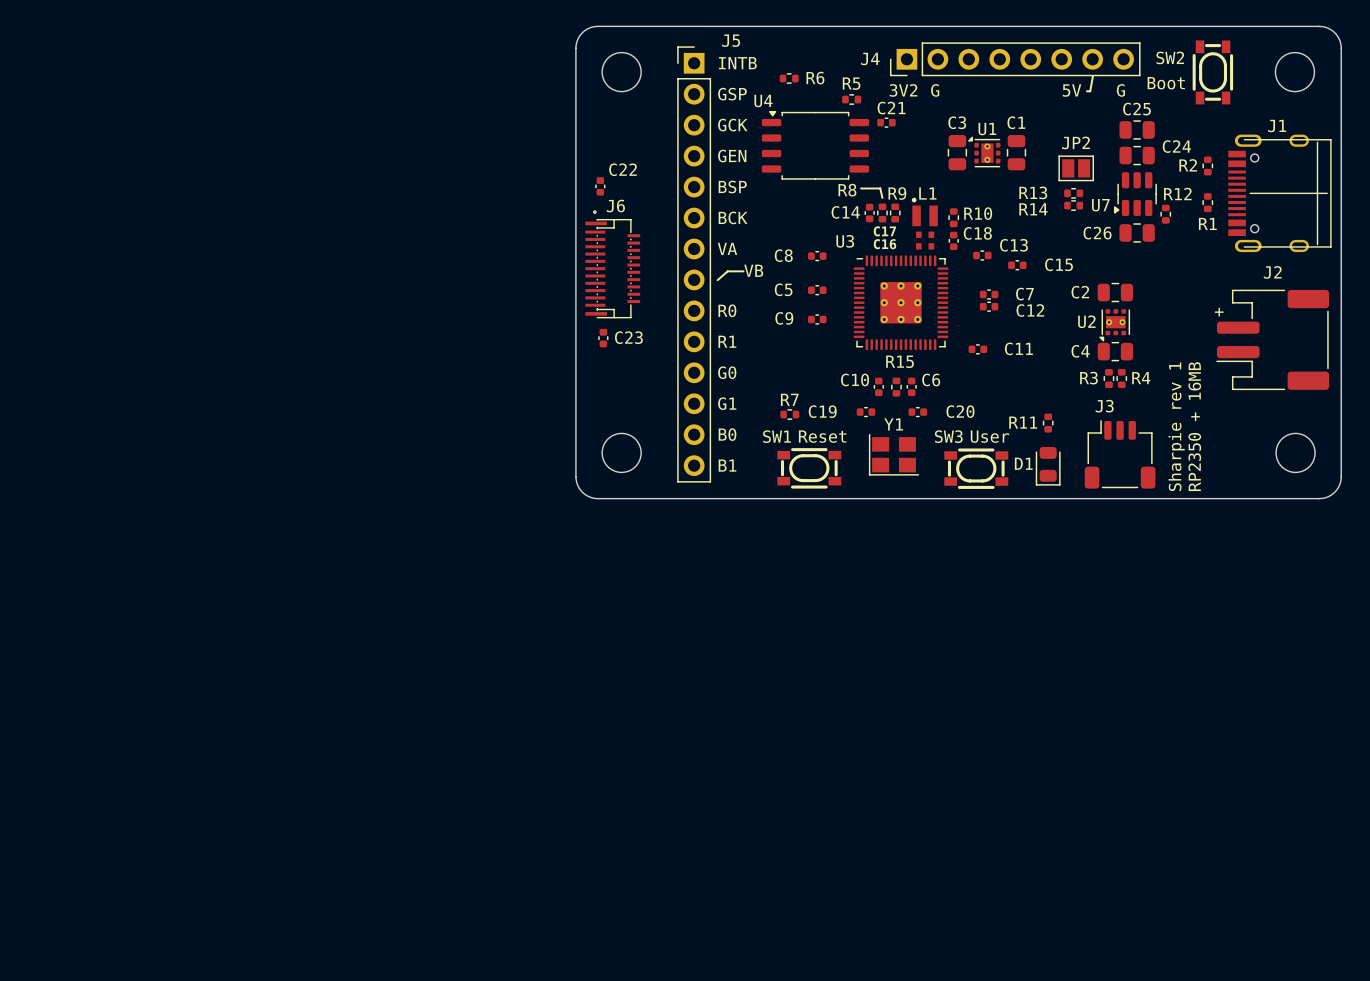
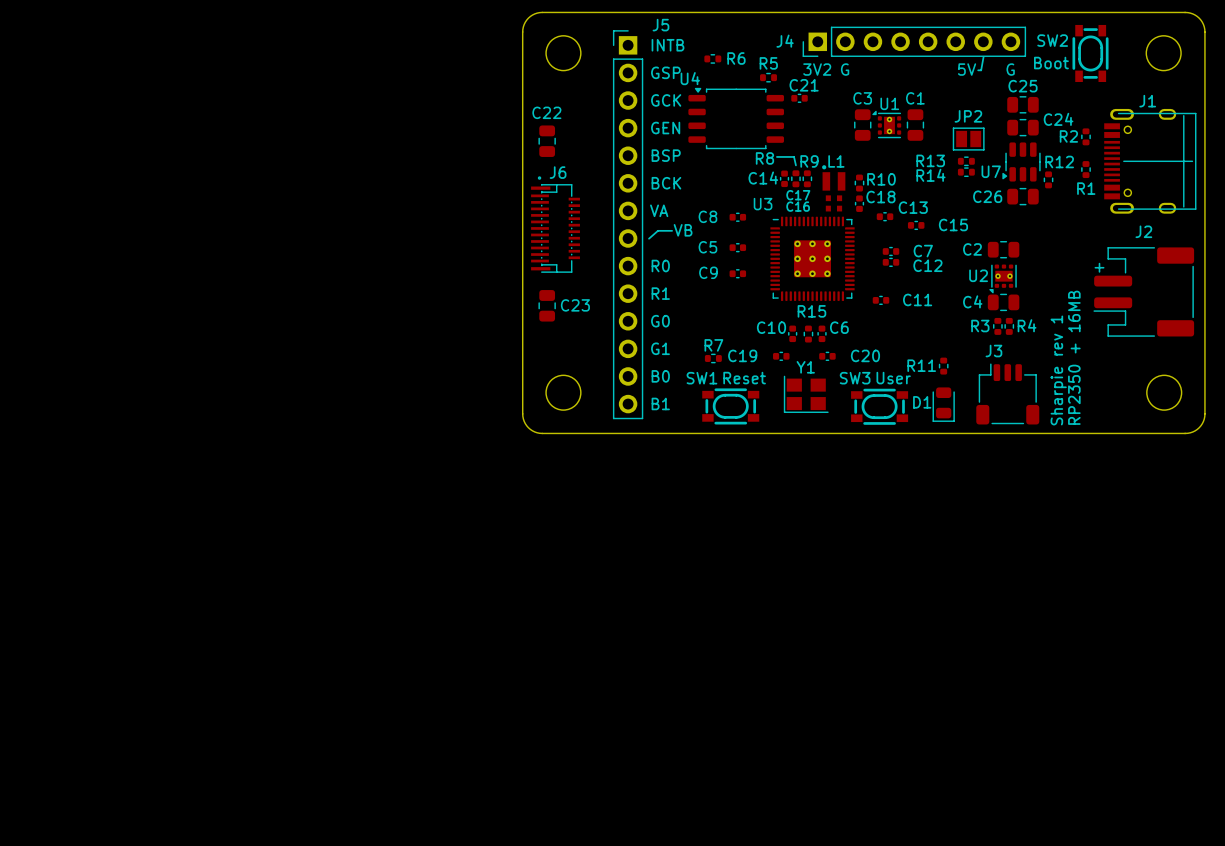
C22 name position: C22 (623, 169) -> C22 (546, 112)
C22 footprint: [595, 177, 606, 196] -> [538, 125, 556, 157]
C23 footprint: [598, 328, 609, 348] -> [538, 290, 556, 322]

